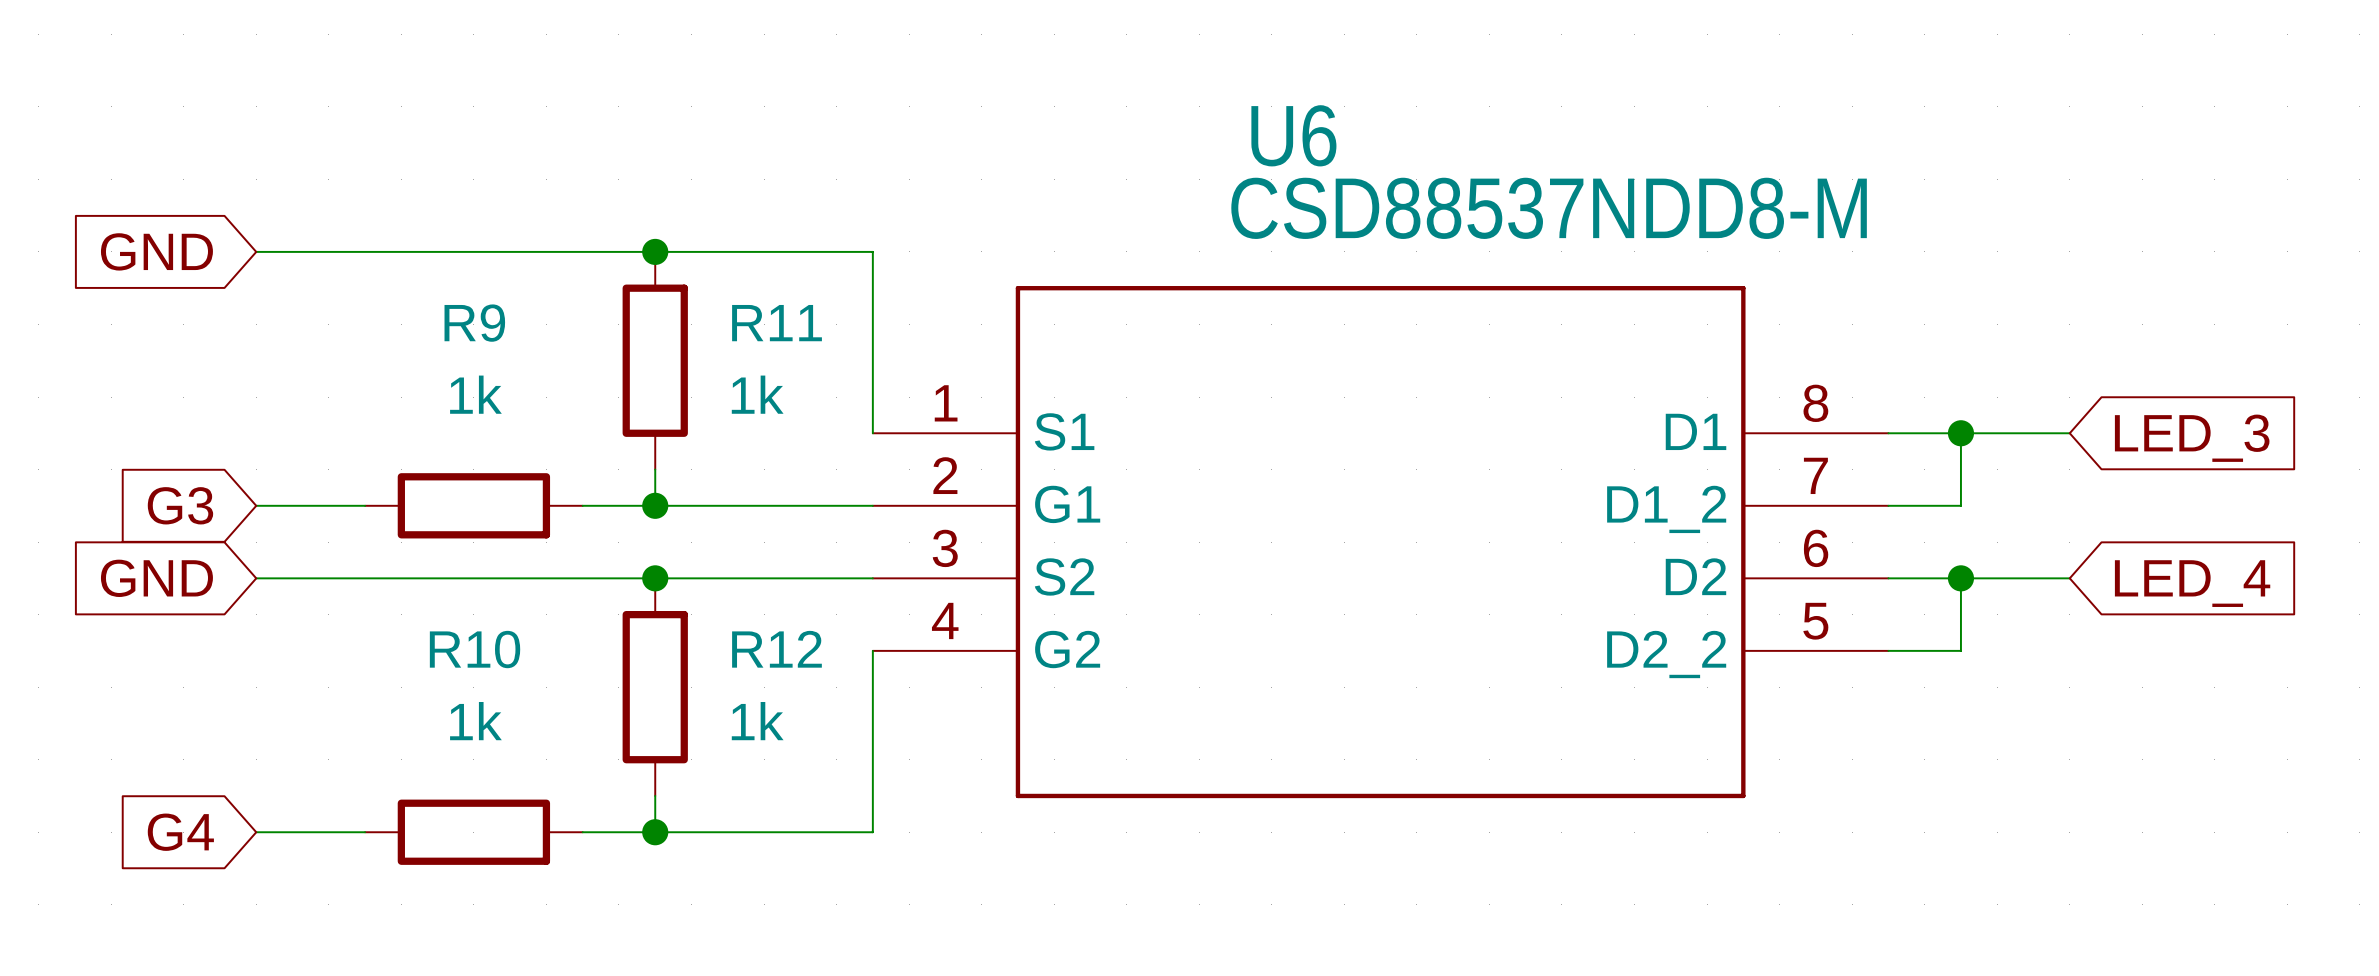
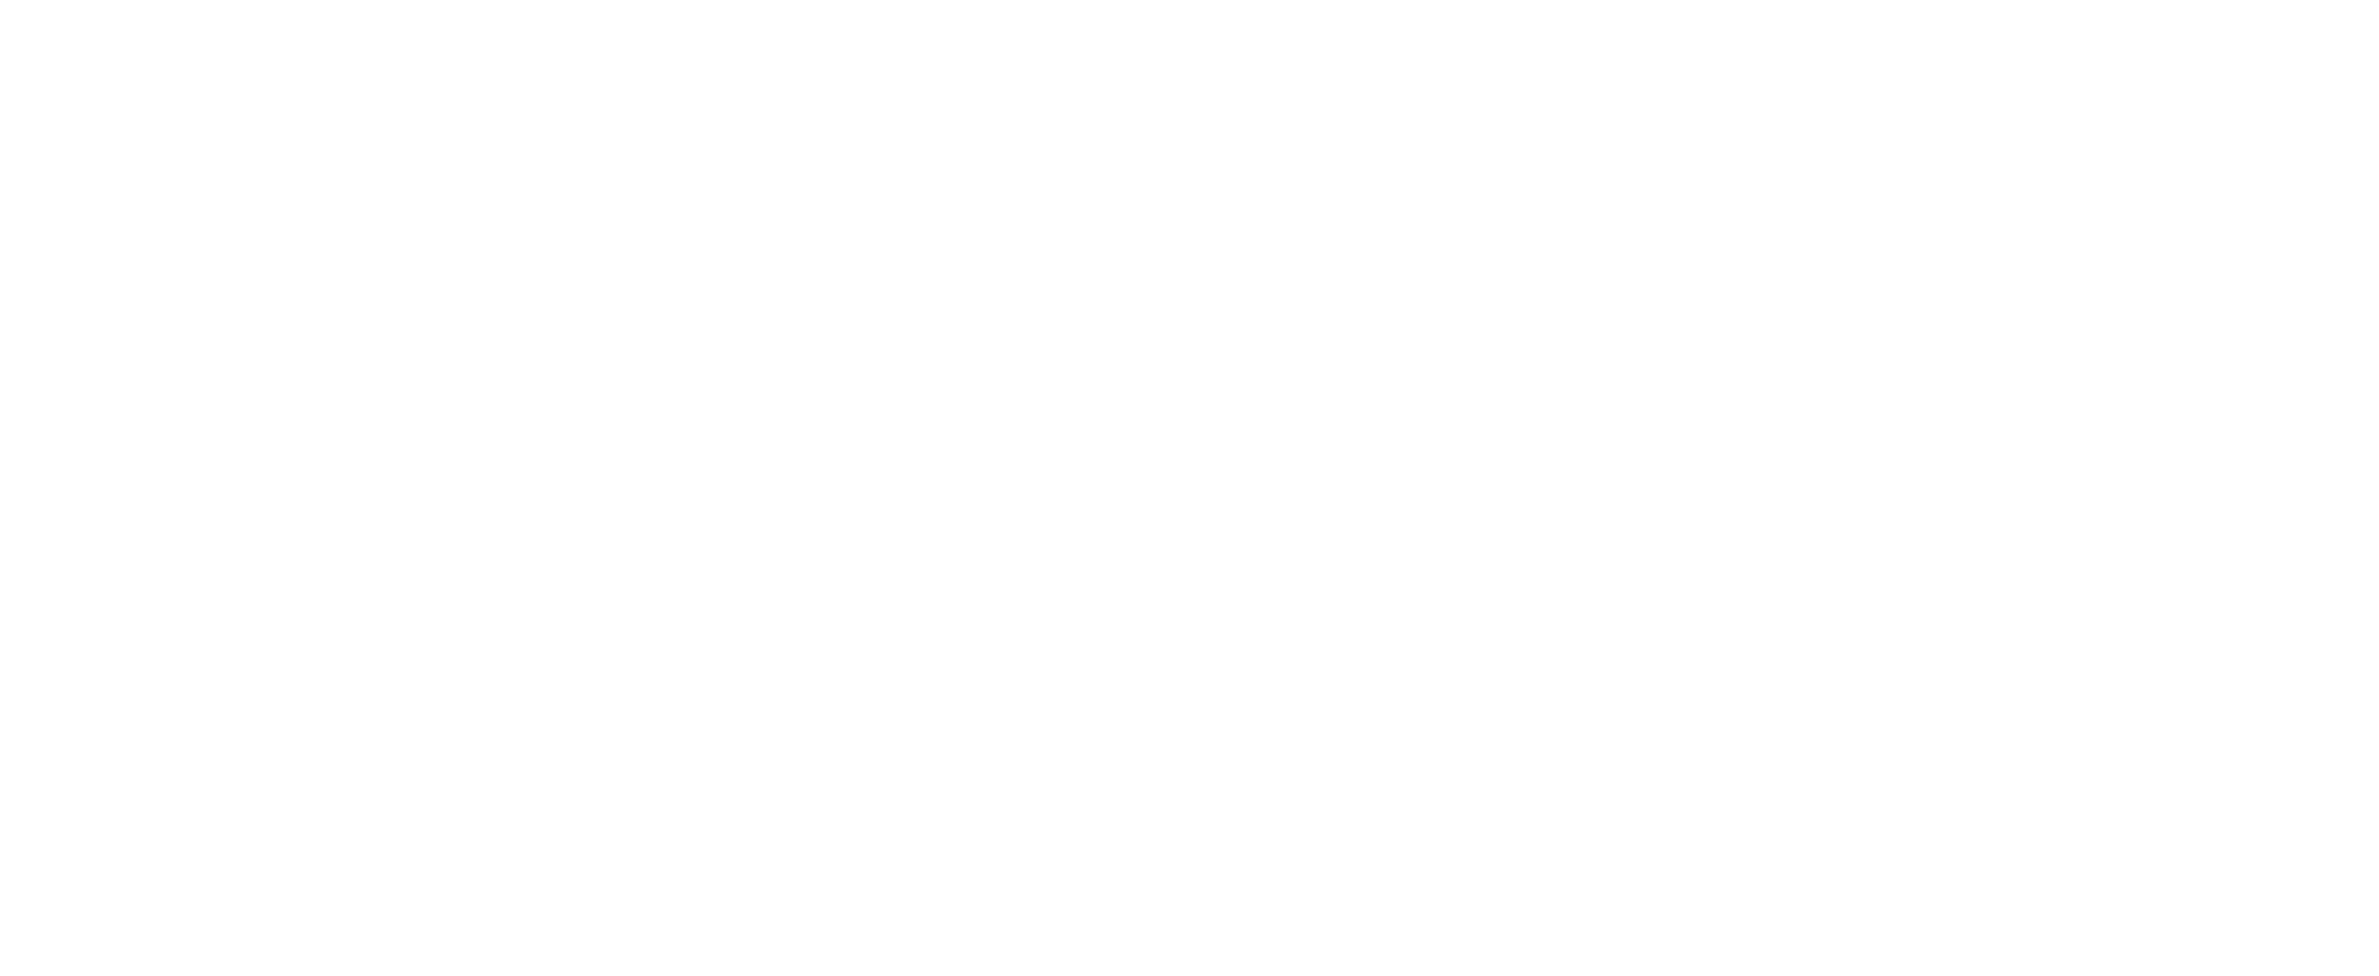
global label: GND (156, 251) -> none
wire: (256, 251) (872, 251) (872, 433) -> none
junction: (655, 251) -> none
R11: 1k (655, 360) -> none
wire: (1888, 433) (2069, 433) -> none
wire: (1960, 433) (1960, 505) (1888, 505) -> none
junction: (1960, 433) -> none
global label: LED_3 (2192, 438) -> none
wire: (655, 469) (655, 505) -> none
global label: G3 (180, 505) -> none
wire: (256, 505) (365, 505) -> none
R9: 1k (473, 505) -> none
wire: (582, 505) (872, 505) -> none
junction: (655, 505) -> none
U6: CSD88537NDD8-M (1380, 542) -> none
global label: GND (156, 578) -> none
wire: (256, 578) (872, 578) -> none
junction: (655, 578) -> none
wire: (1888, 578) (2069, 578) -> none
wire: (1960, 578) (1960, 650) (1888, 650) -> none
junction: (1960, 578) -> none
global label: LED_4 (2192, 583) -> none
wire: (872, 650) (872, 832) (582, 832) -> none
R12: 1k (655, 687) -> none
wire: (655, 795) (655, 832) -> none
global label: G4 (180, 832) -> none
wire: (256, 832) (365, 832) -> none
R10: 1k (473, 832) -> none
junction: (655, 832) -> none

